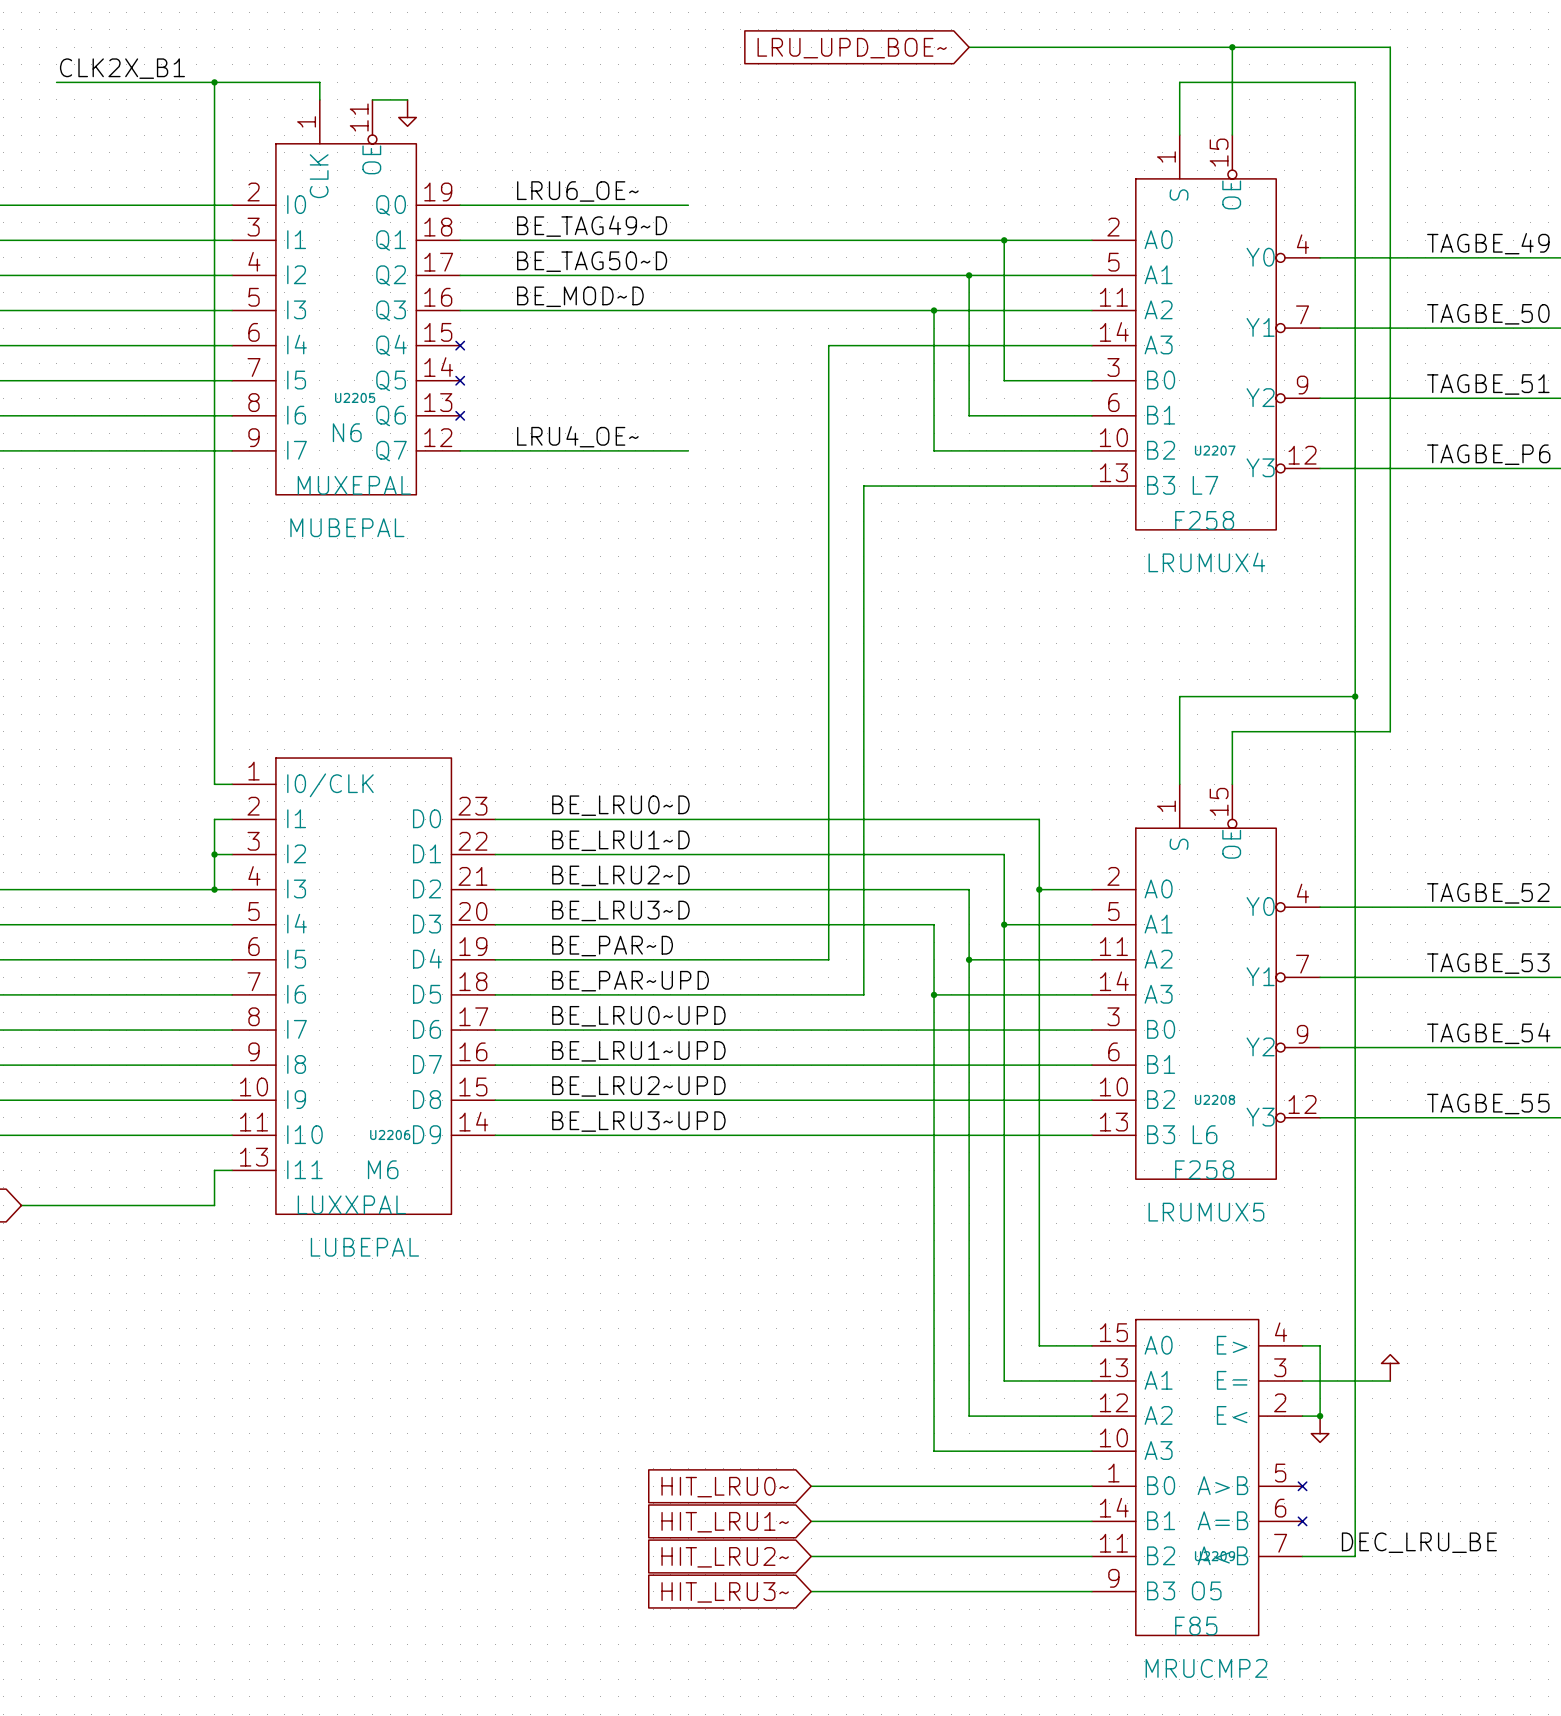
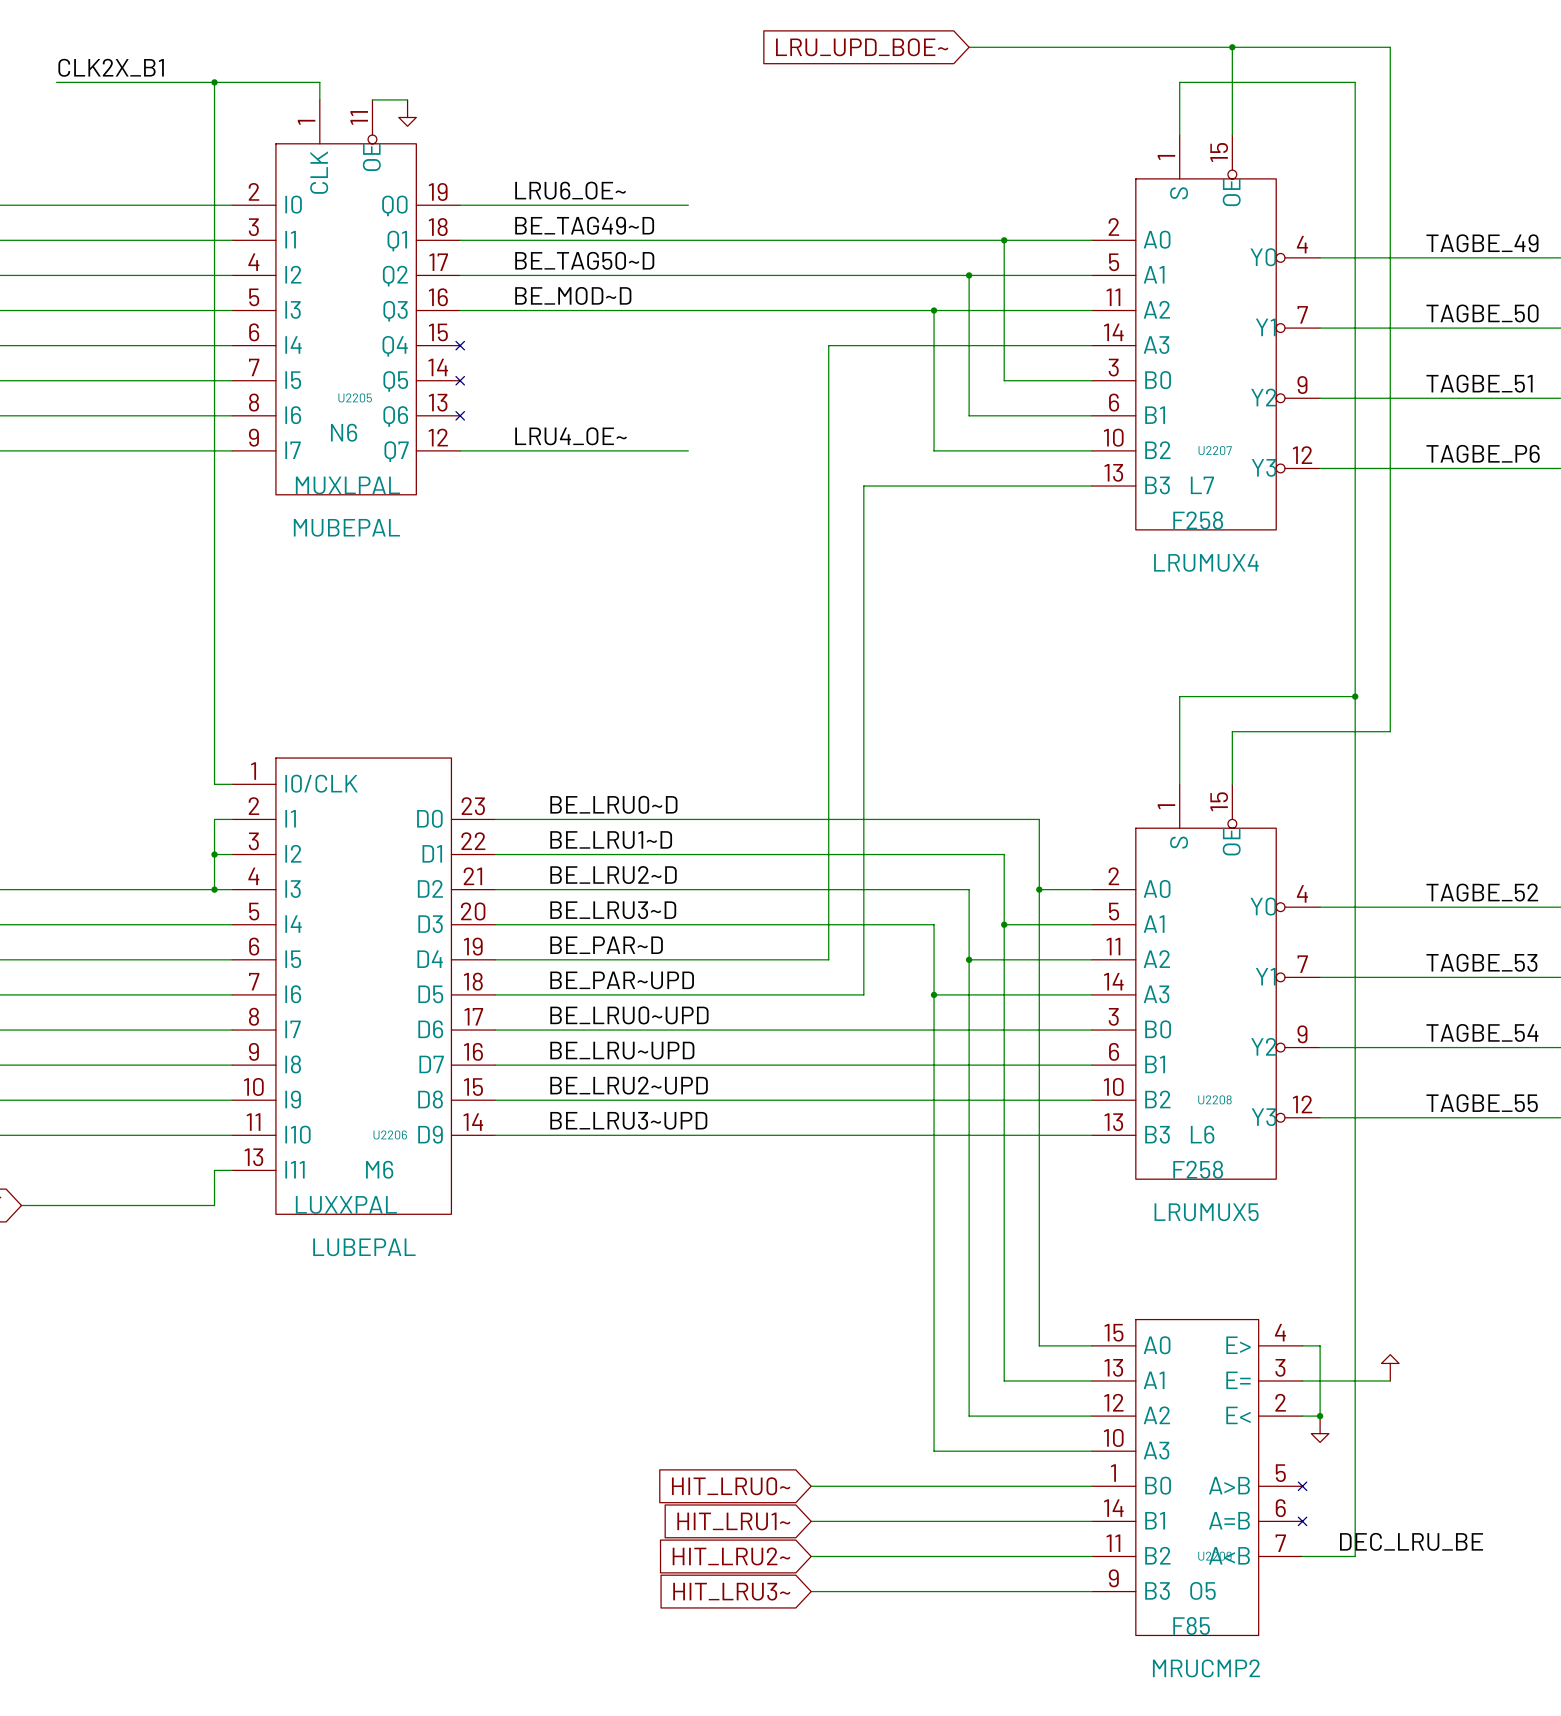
U2205 value: MUXEPAL (354, 485) -> MUXLPAL (347, 485)
label: BE_LRU1~UPD (638, 1051) -> BE_LRU~UPD (622, 1050)

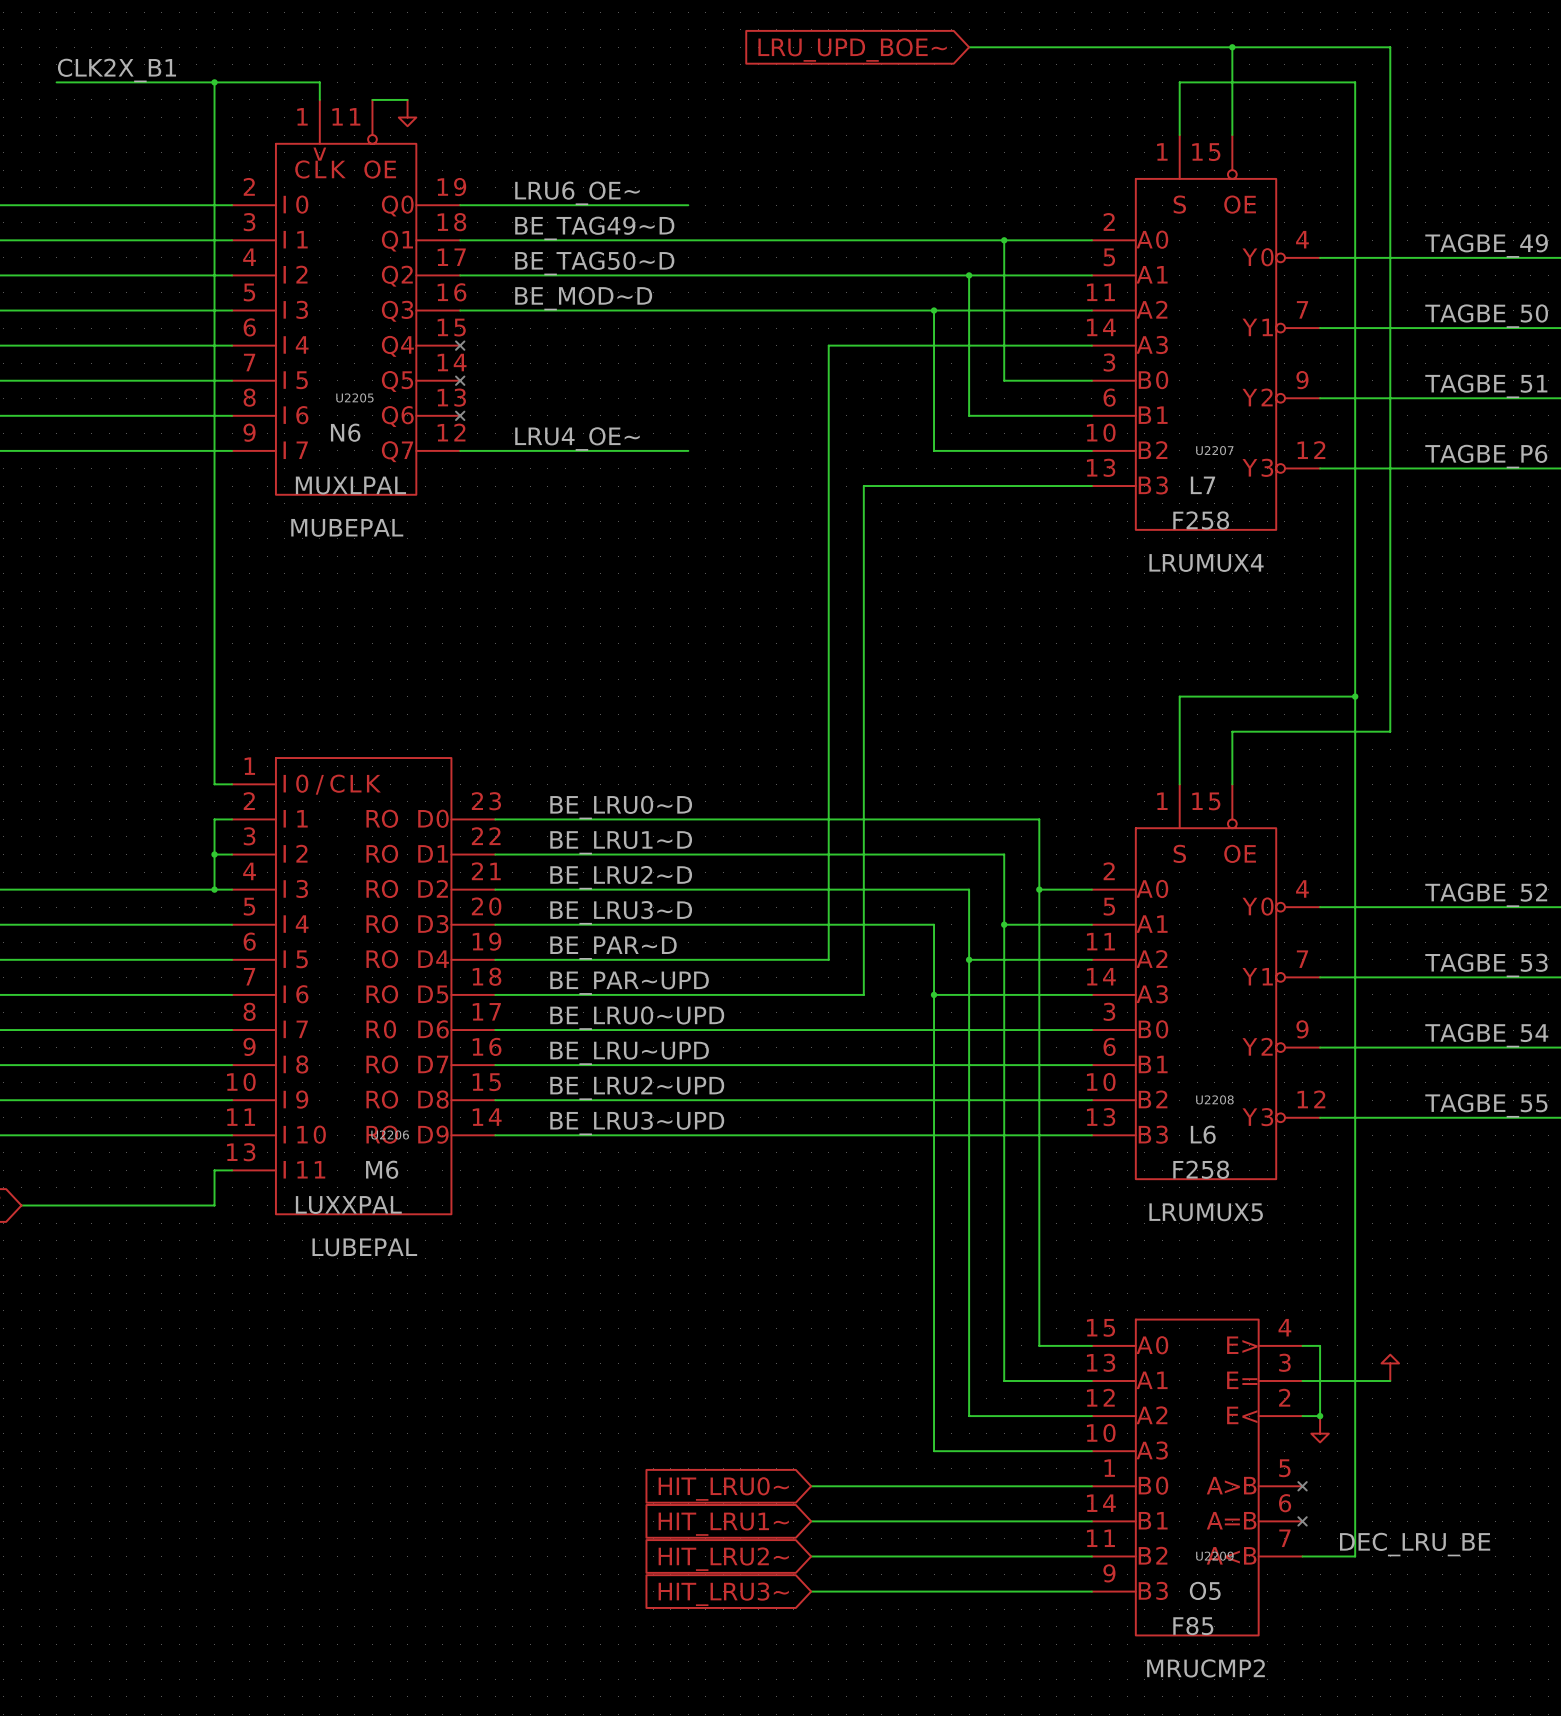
U2205 symbol: [232, 99, 461, 495] -> [232, 99, 461, 495]
U2207 symbol: [1091, 135, 1321, 530] -> [1091, 135, 1321, 530]
U2206 symbol: [232, 758, 496, 1215] -> [232, 758, 496, 1215]
U2208 symbol: [1091, 784, 1321, 1180] -> [1091, 784, 1321, 1180]
U2209 symbol: [1091, 1319, 1303, 1636] -> [1091, 1319, 1303, 1636]

